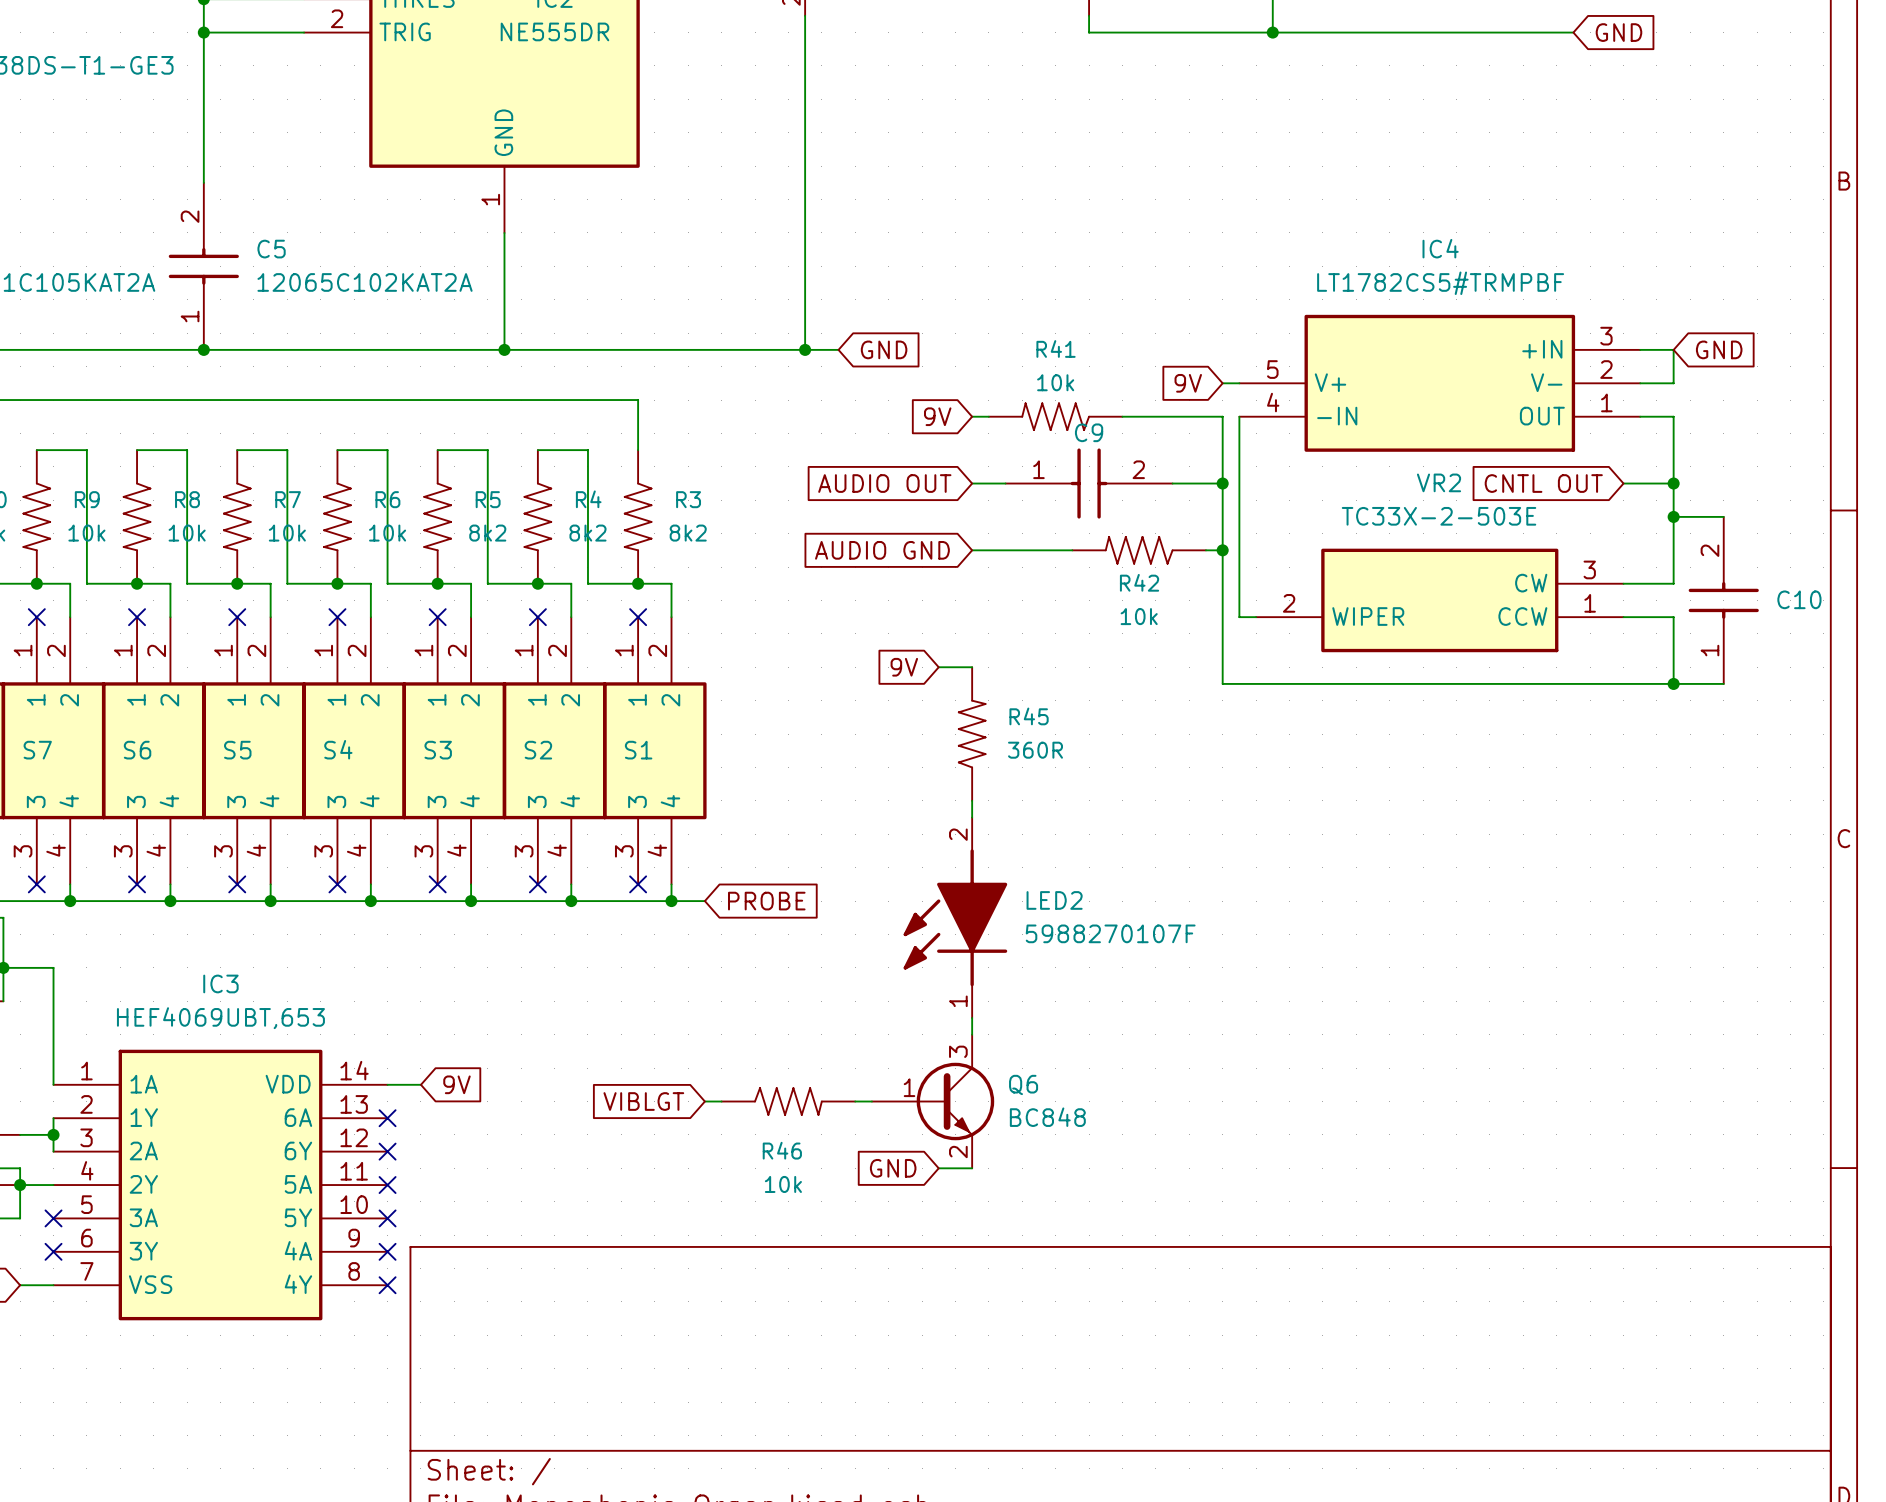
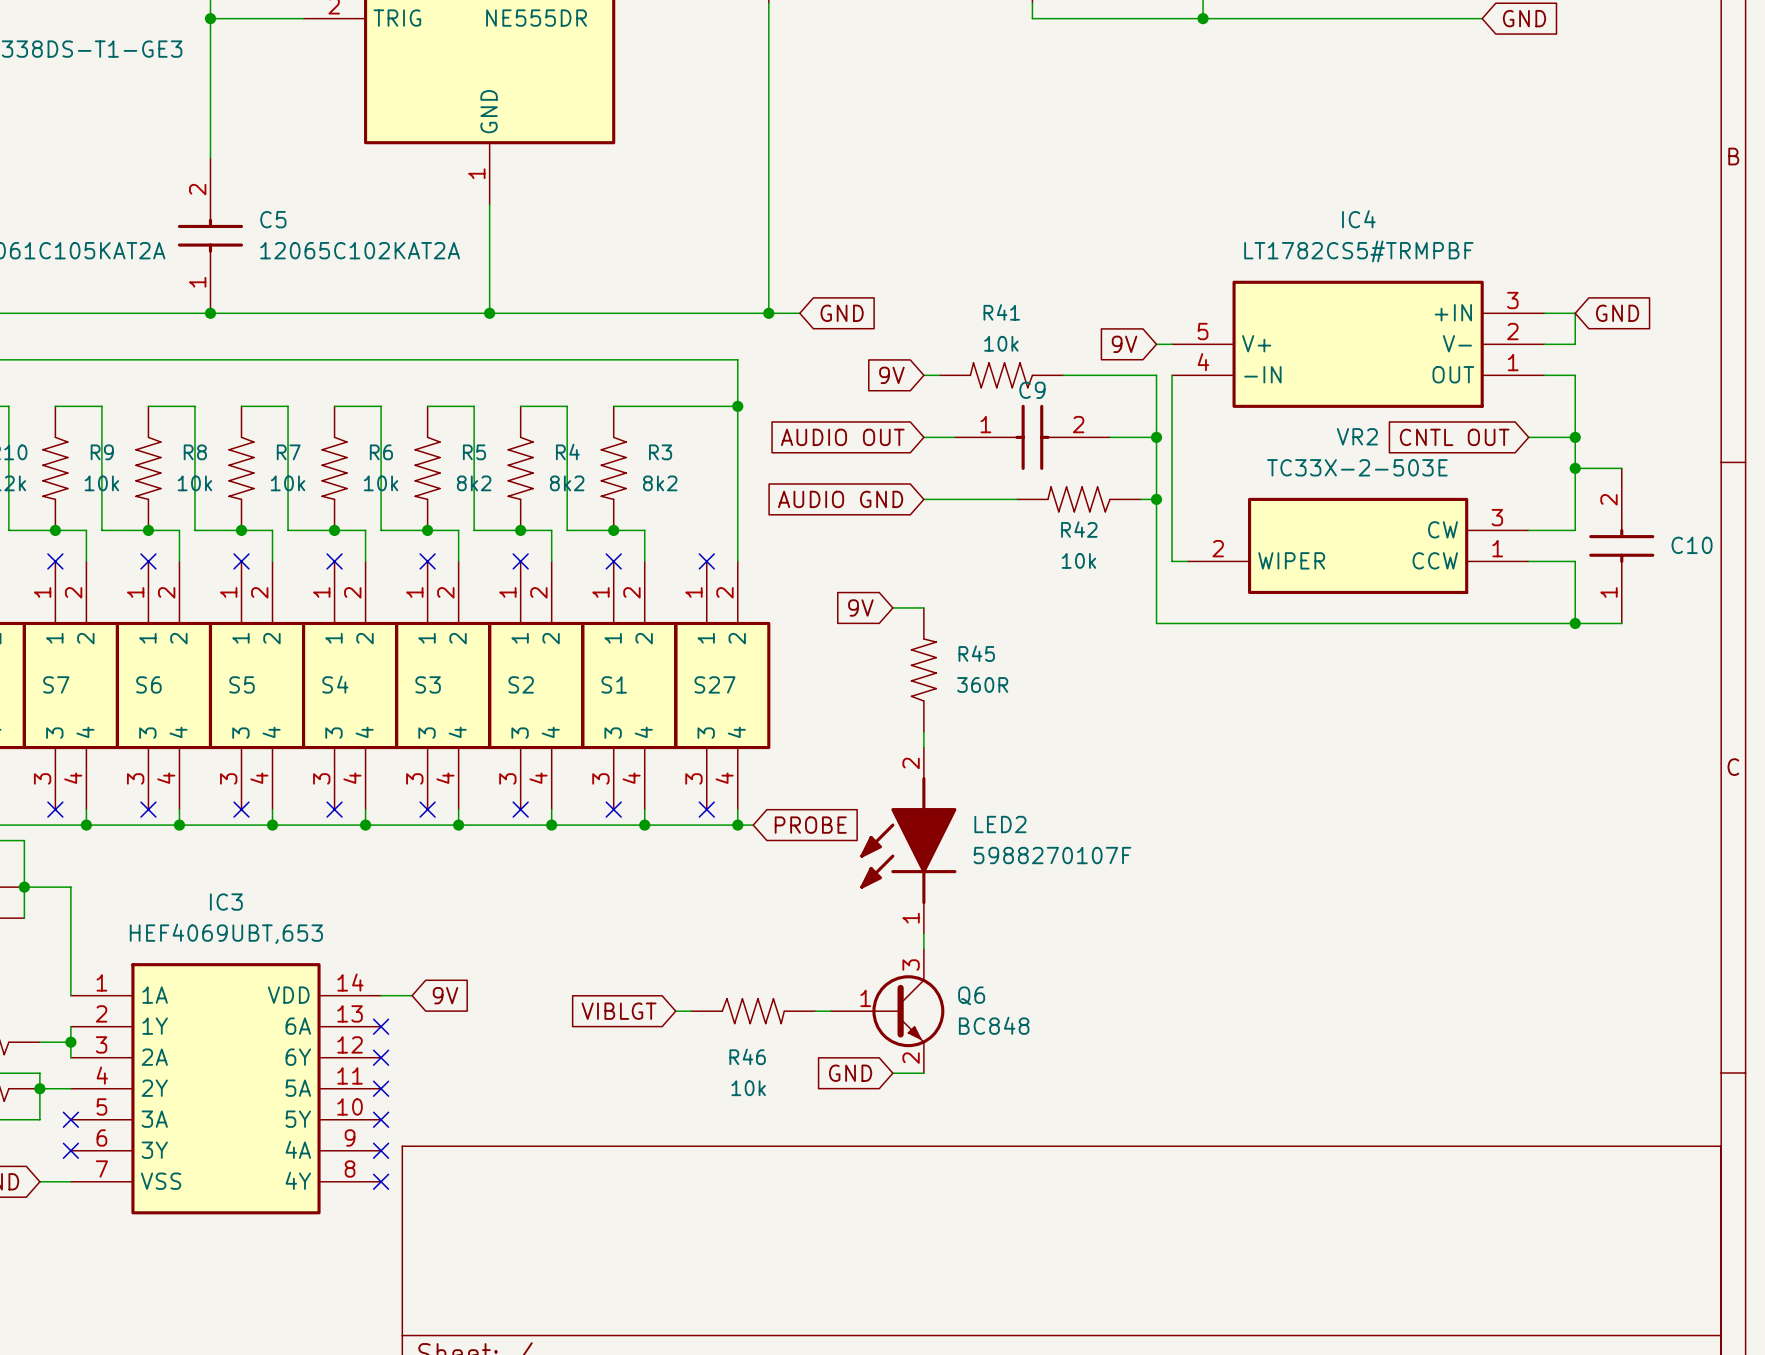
wire: (638, 400) (638, 450) -> (737, 406) (613, 406)
wire: none -> (613, 359) (737, 359) (737, 561)
junction: none -> (737, 406)
no-connect mark: none -> (706, 561)
S27: none -> (722, 685)
no-connect mark: none -> (706, 809)
wire: none -> (737, 809) (737, 825)
wire: none -> (675, 825) (753, 825)
global label position: PROBE (766, 901) -> PROBE (810, 825)
junction: none -> (737, 825)

